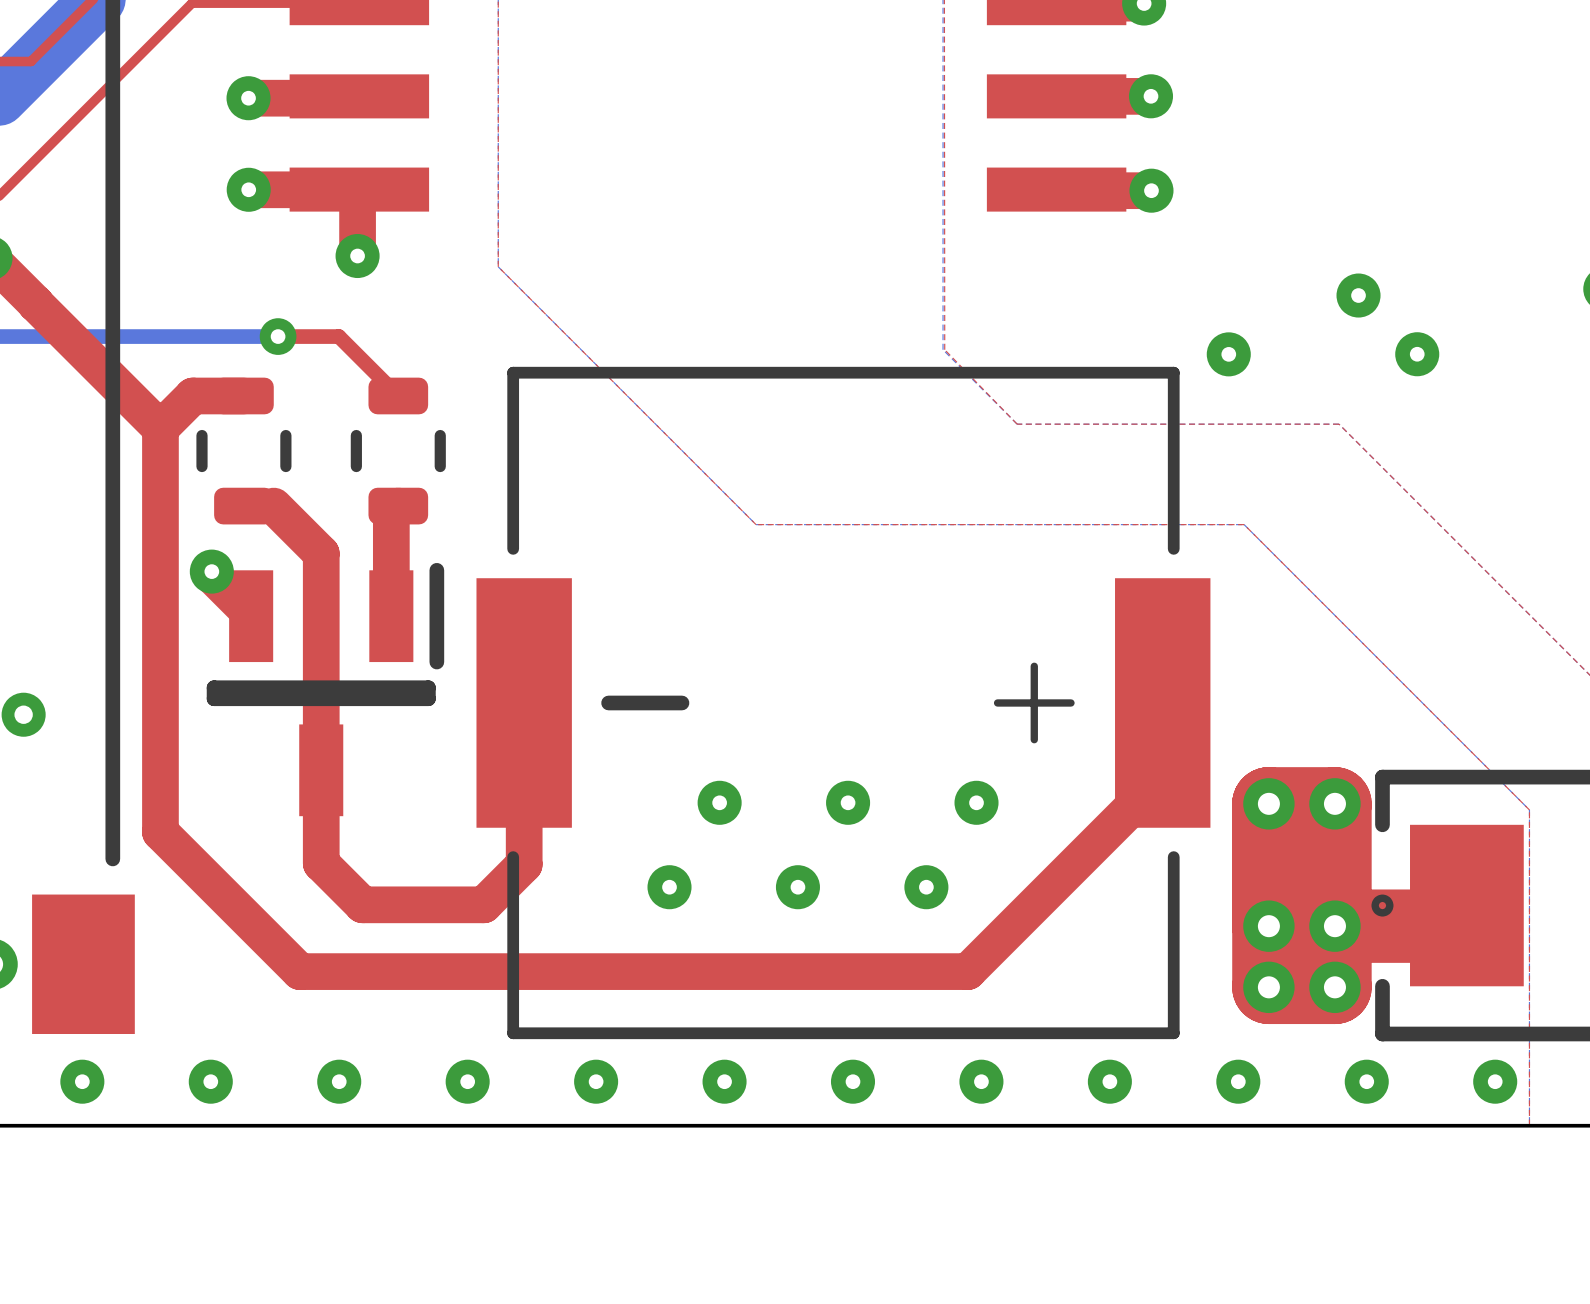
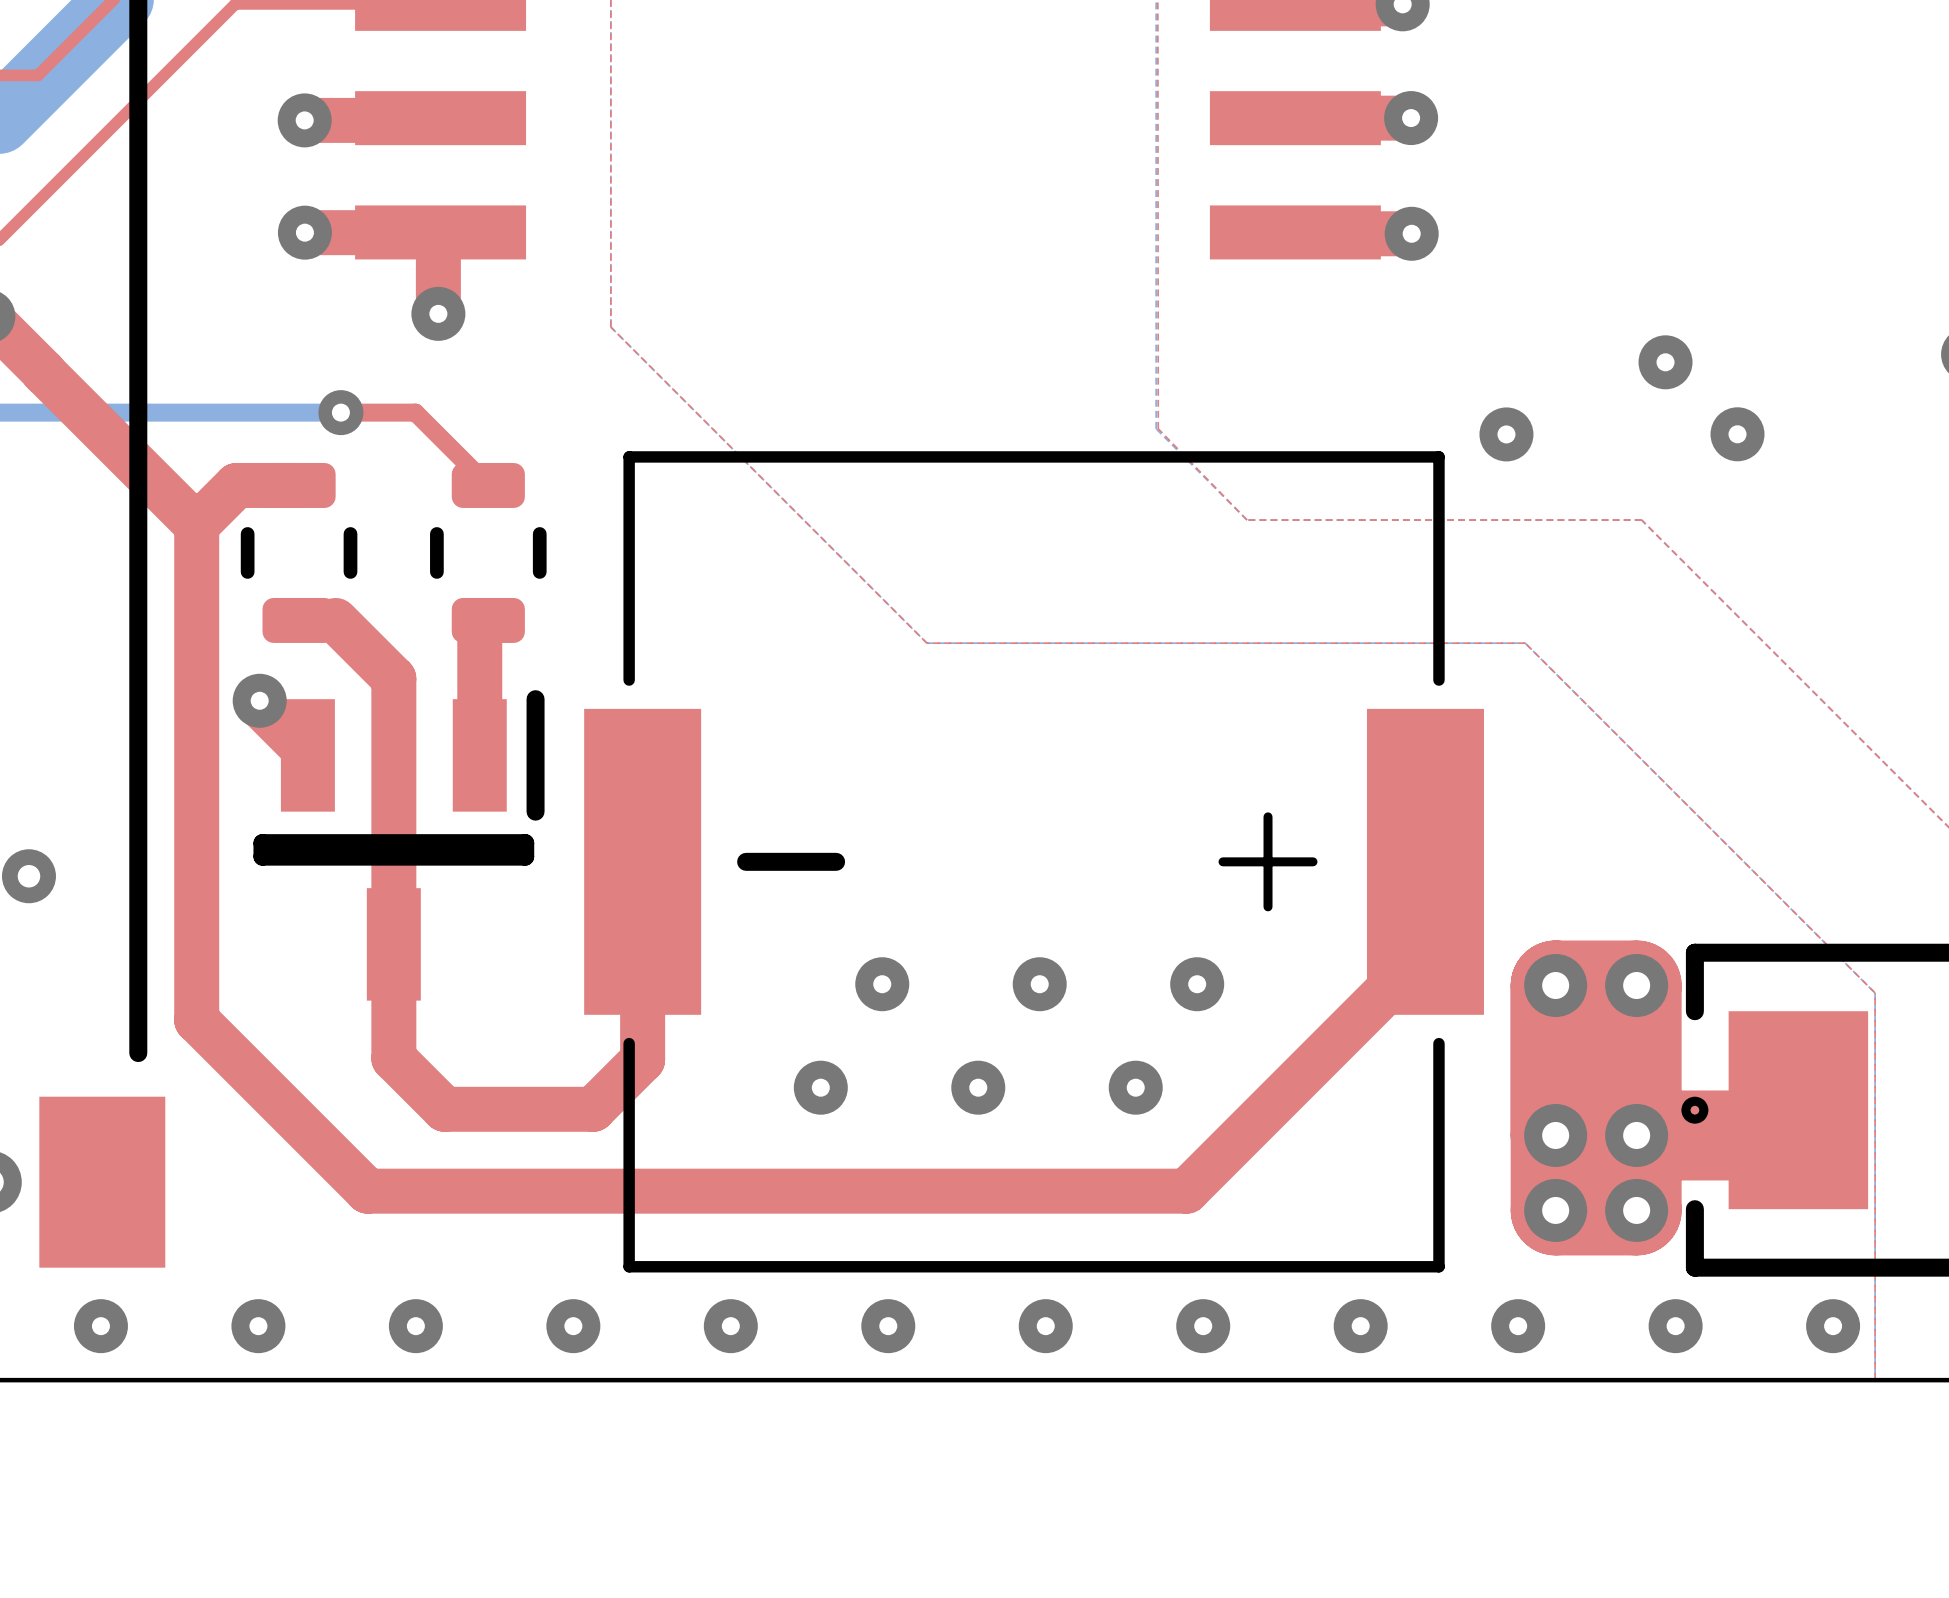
part footprint: [476, 366, 1211, 1040] -> [584, 451, 1484, 1273]

